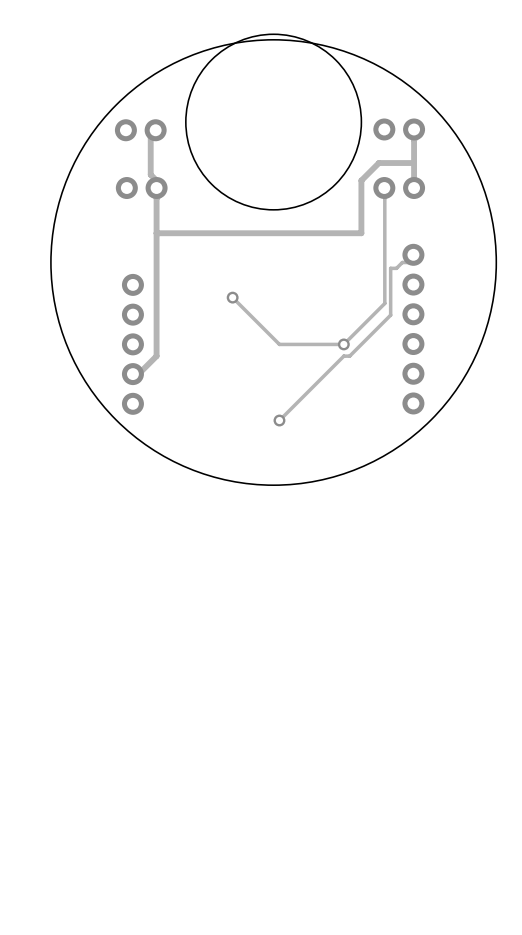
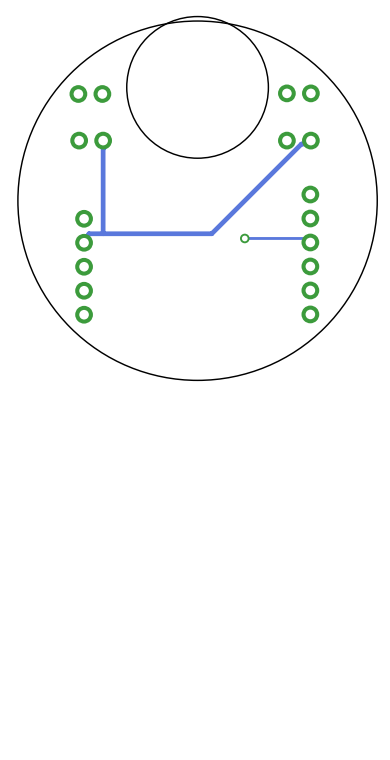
track: (414, 129) (414, 127) (419, 127) (419, 133) (414, 139) (414, 188) -> (84, 242) (88, 233) (211, 233) (301, 144) (310, 144) (310, 140)
track: (155, 130) (150, 133) (150, 174) (162, 186) -> none
track: (414, 163) (378, 163) (361, 180) (361, 233) (156, 233) -> none
track: (384, 188) (390, 186) (390, 192) (384, 198) (384, 303) (343, 344) (279, 344) (232, 297) -> none
track: (413, 254) (414, 256) (408, 262) (402, 262) (396, 268) (390, 268) (390, 315) (349, 356) (343, 356) (279, 420) -> none
via: (232, 297) -> none
track: (156, 303) (156, 356) (139, 373) (132, 374) -> none
track: none -> (244, 238) (306, 238) (310, 242)
via position: (343, 344) -> (244, 238)
via: (279, 420) -> none

